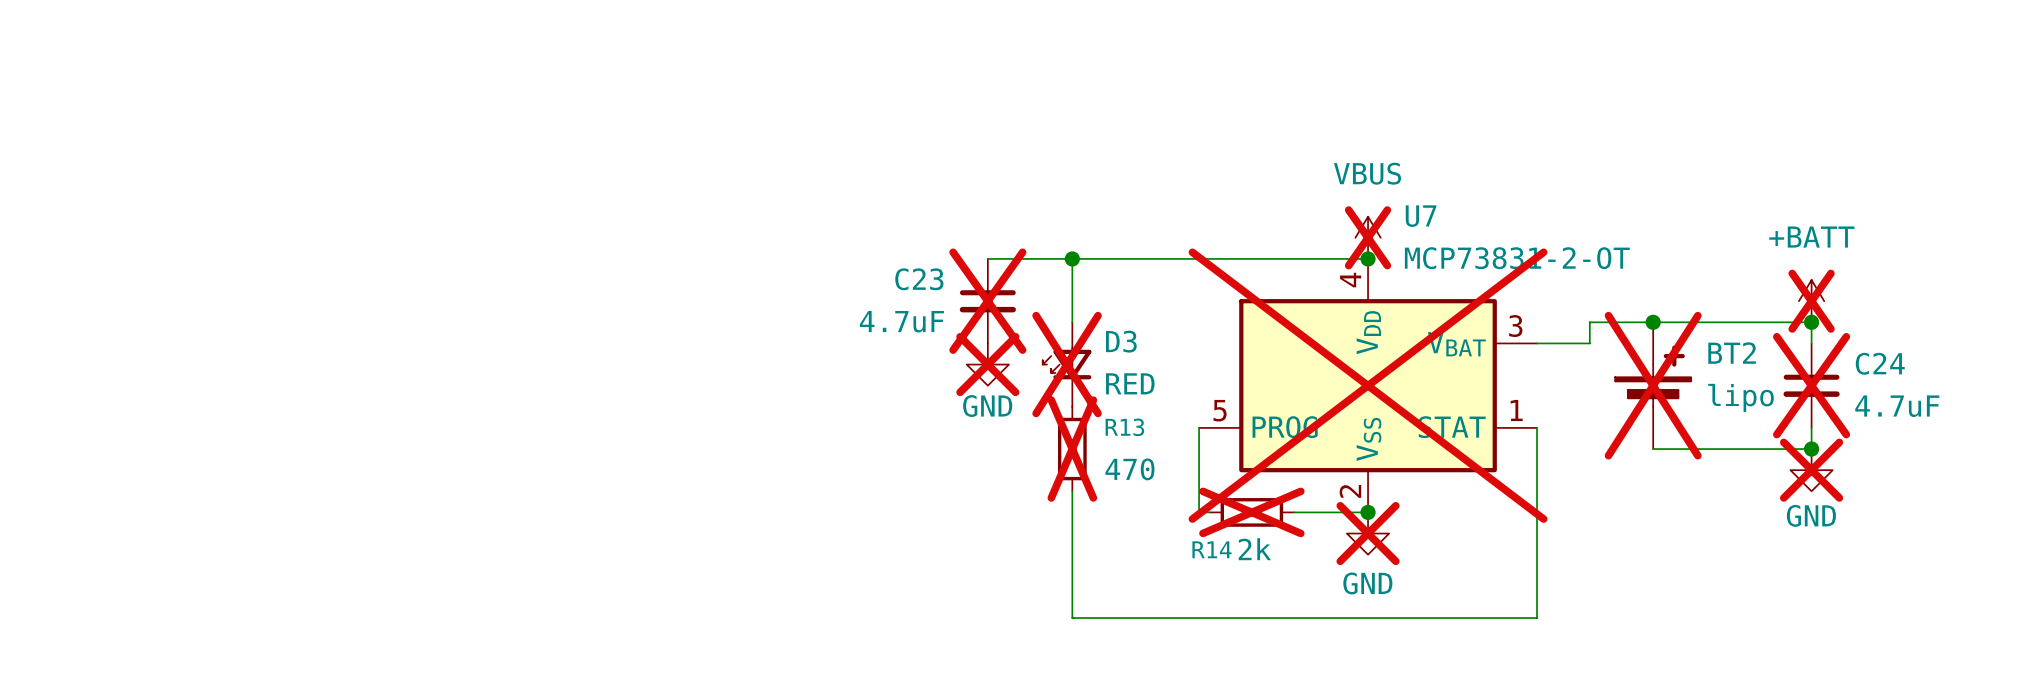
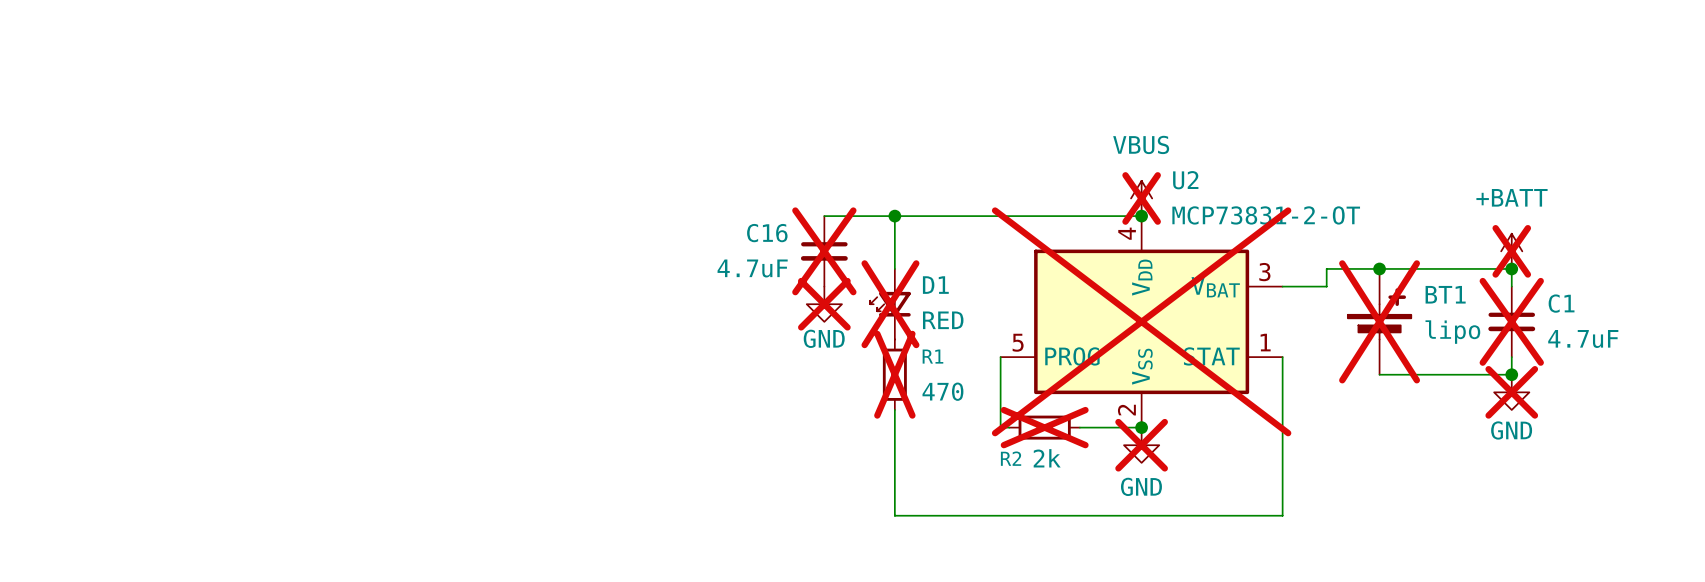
U7 name: U7 (1421, 216) -> U2 (1185, 180)
C23 name: C23 (919, 279) -> C16 (767, 233)
D3 name: D3 (1121, 341) -> D1 (935, 285)
BT2 name: BT2 (1732, 353) -> BT1 (1445, 294)
C24 name: C24 (1880, 363) -> C1 (1561, 303)
R13 name: R13 (1124, 427) -> R1 (932, 356)
R14 name: R14 (1212, 549) -> R2 (1011, 458)

